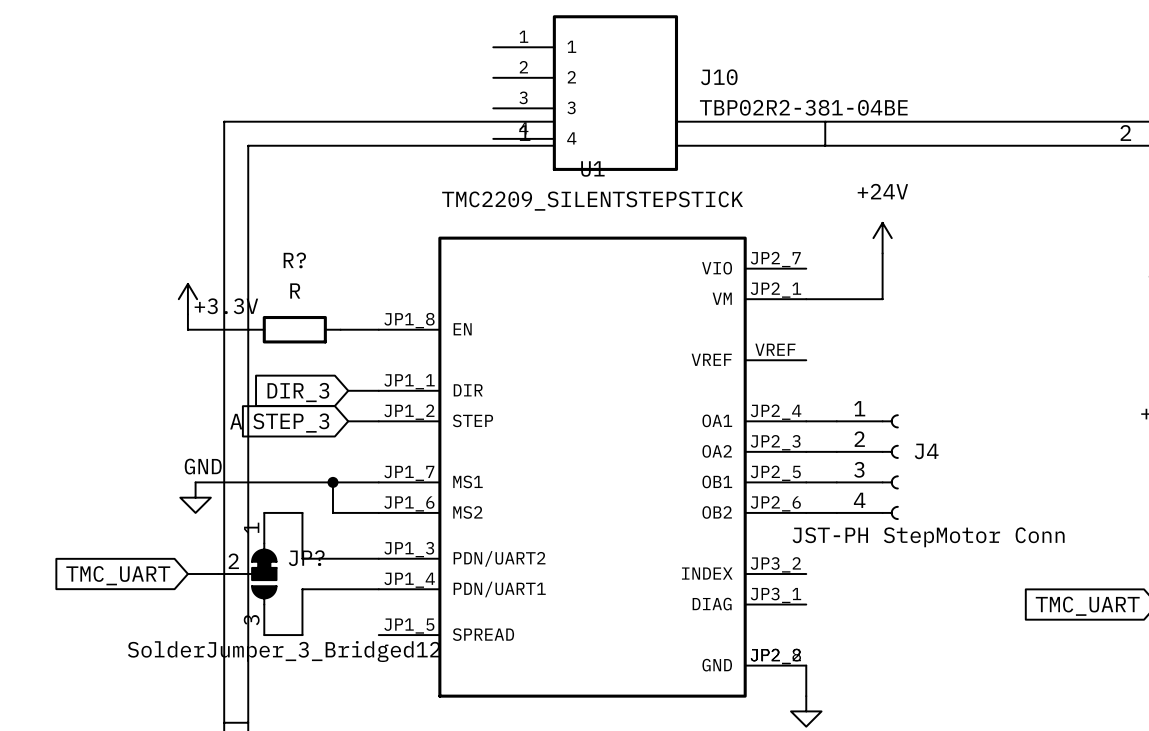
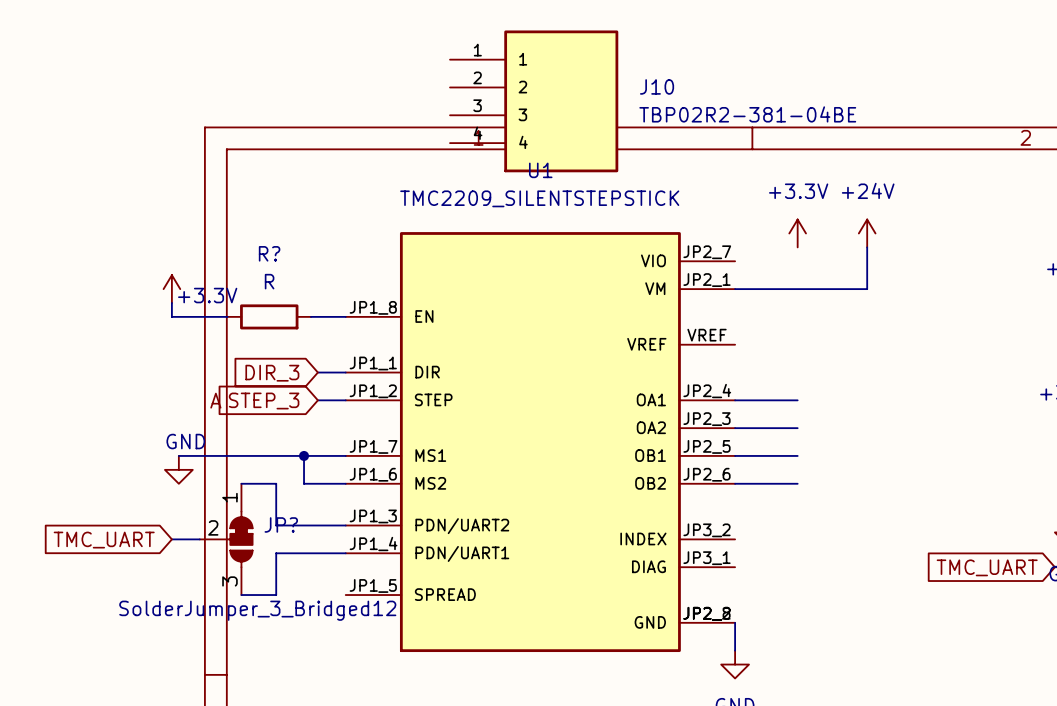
power symbol: +24V (882, 238) -> +3.3V (797, 233)
power symbol: none -> +24V (867, 233)
wire: (882, 253) (882, 299) -> (867, 247) (867, 289) (804, 289)
J4: JST-PH StepMotor Conn (867, 467) -> none

